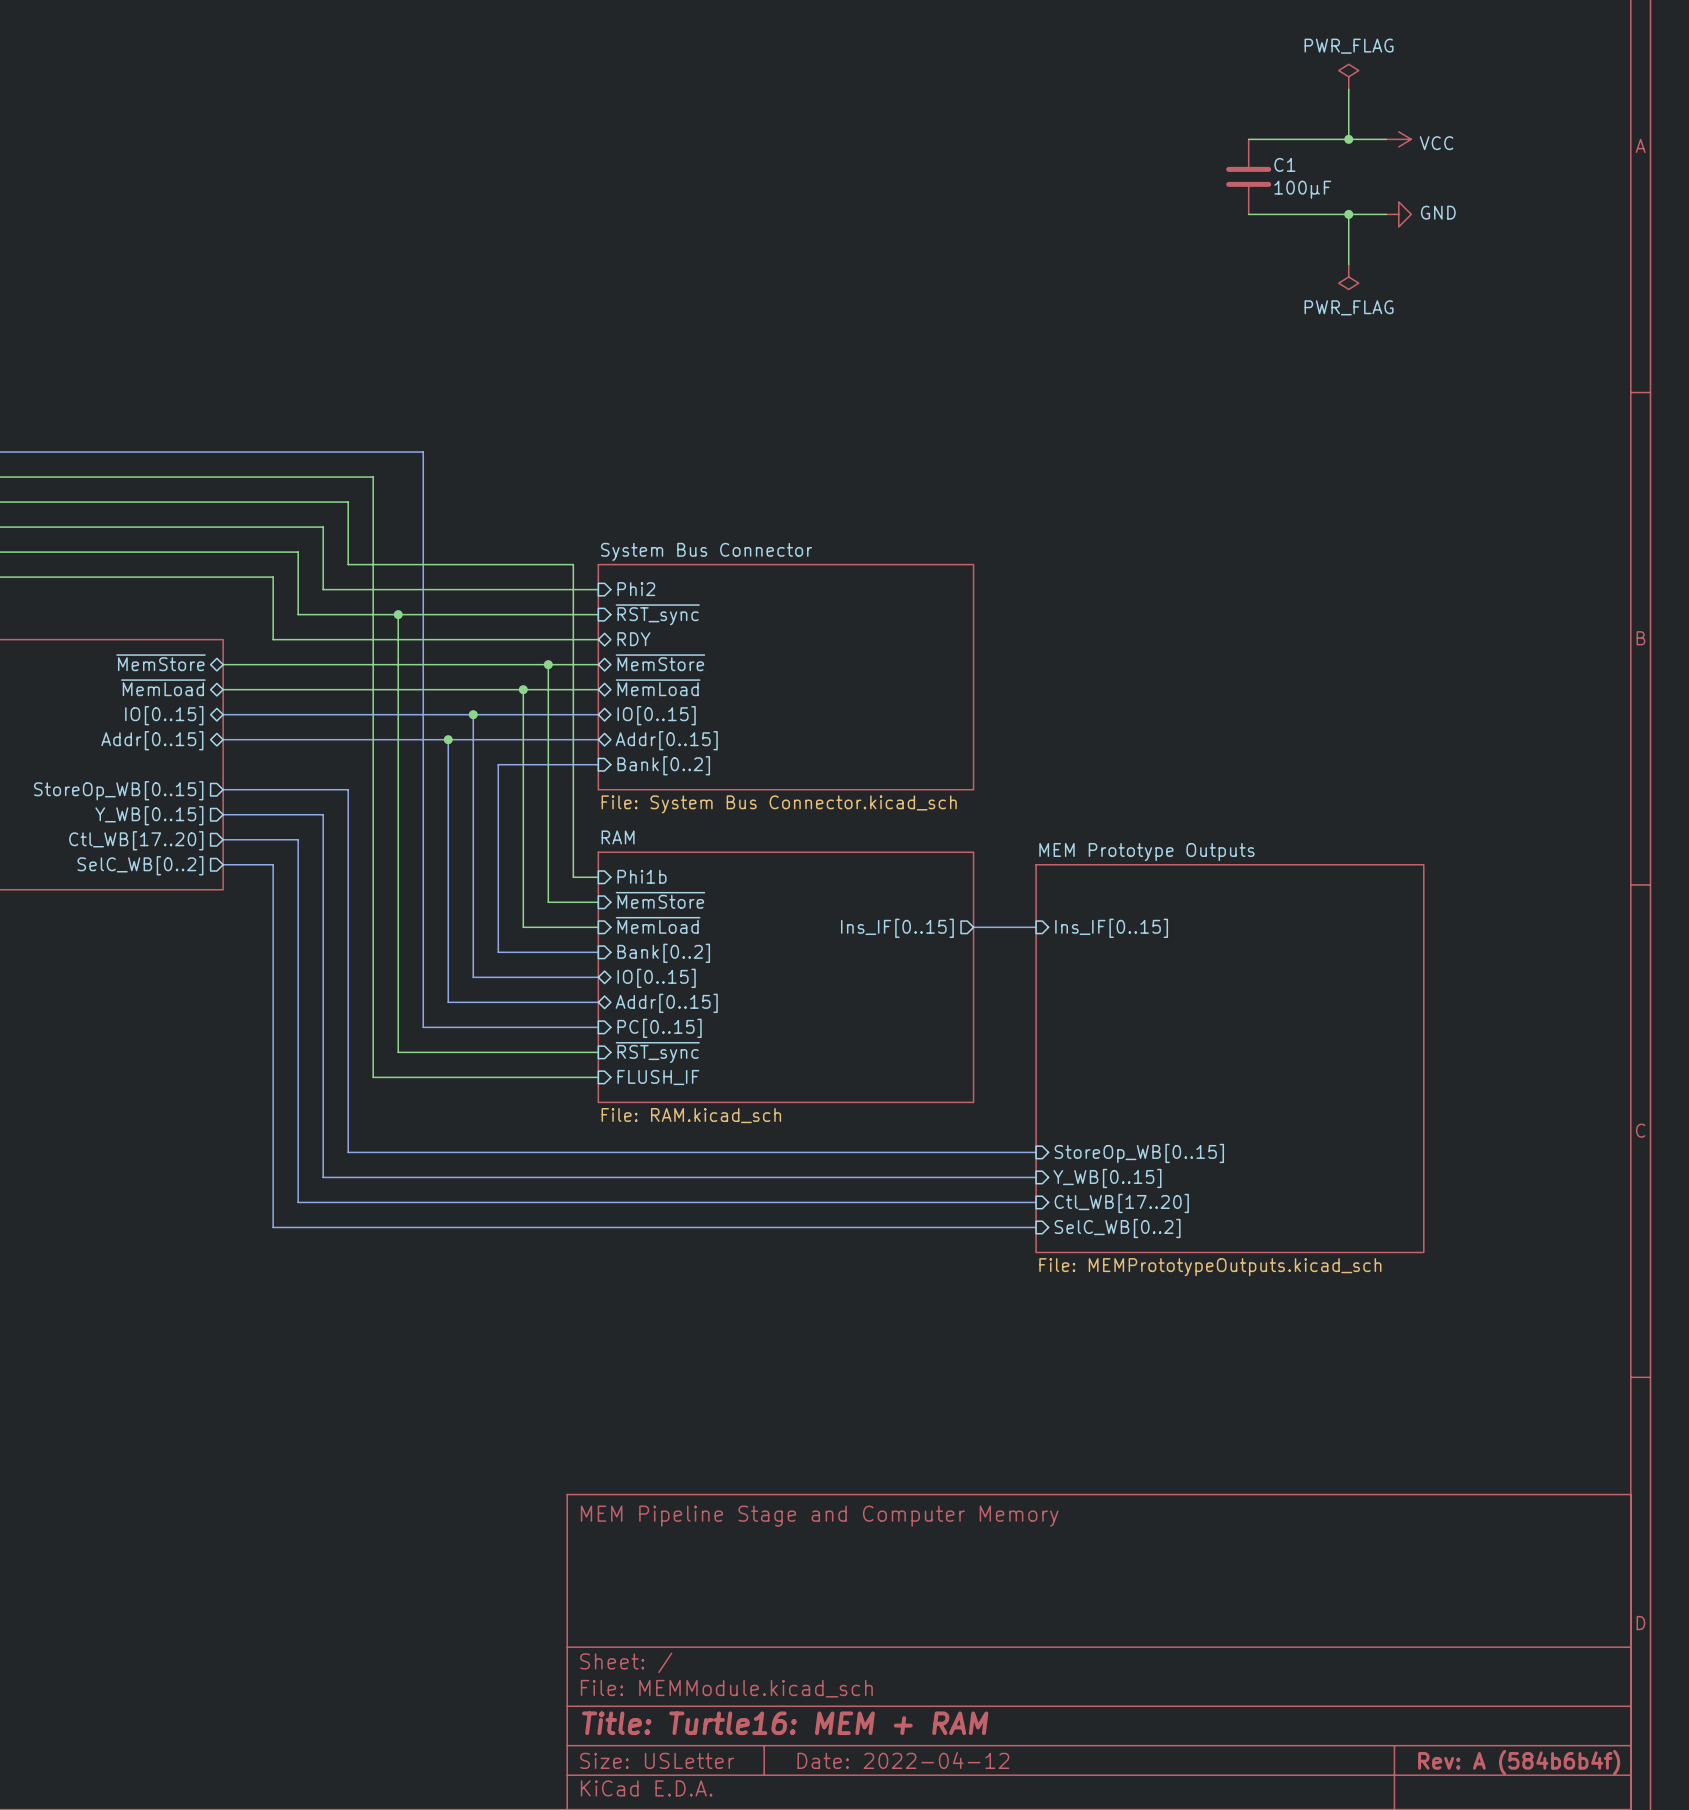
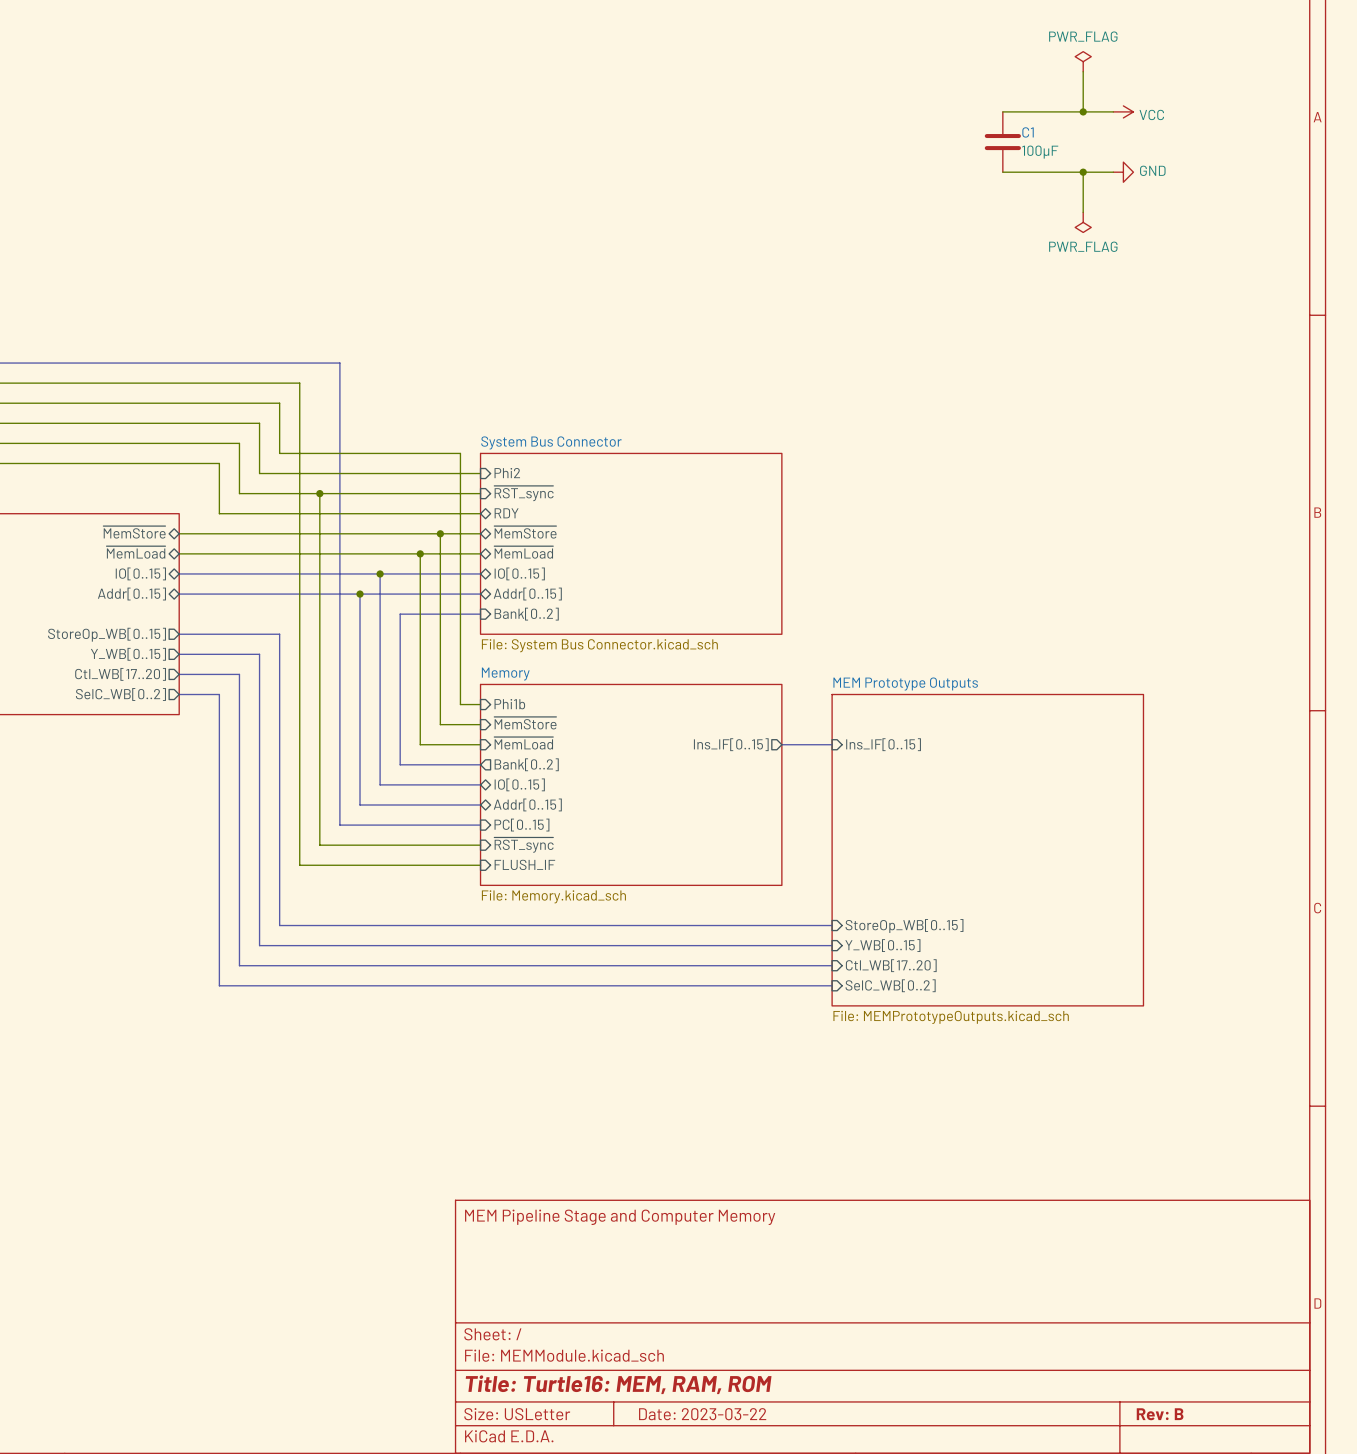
sheet RAM name: RAM (618, 837) -> Memory (505, 674)
sheet pin shape: input (663, 953) -> output (526, 764)
sheet RAM value: File: RAM.kicad_sch (691, 1115) -> File: Memory.kicad_sch (553, 896)
title block: Title: Turtle16: MEM + RAM (785, 1723) -> Title: Turtle16: MEM, RAM, ROM (618, 1384)
title block: Date: 2022-04-12 (903, 1760) -> Date: 2023-03-22 (702, 1414)
title block: Rev: A (584b6b4f) (1519, 1762) -> Rev: B (1160, 1414)

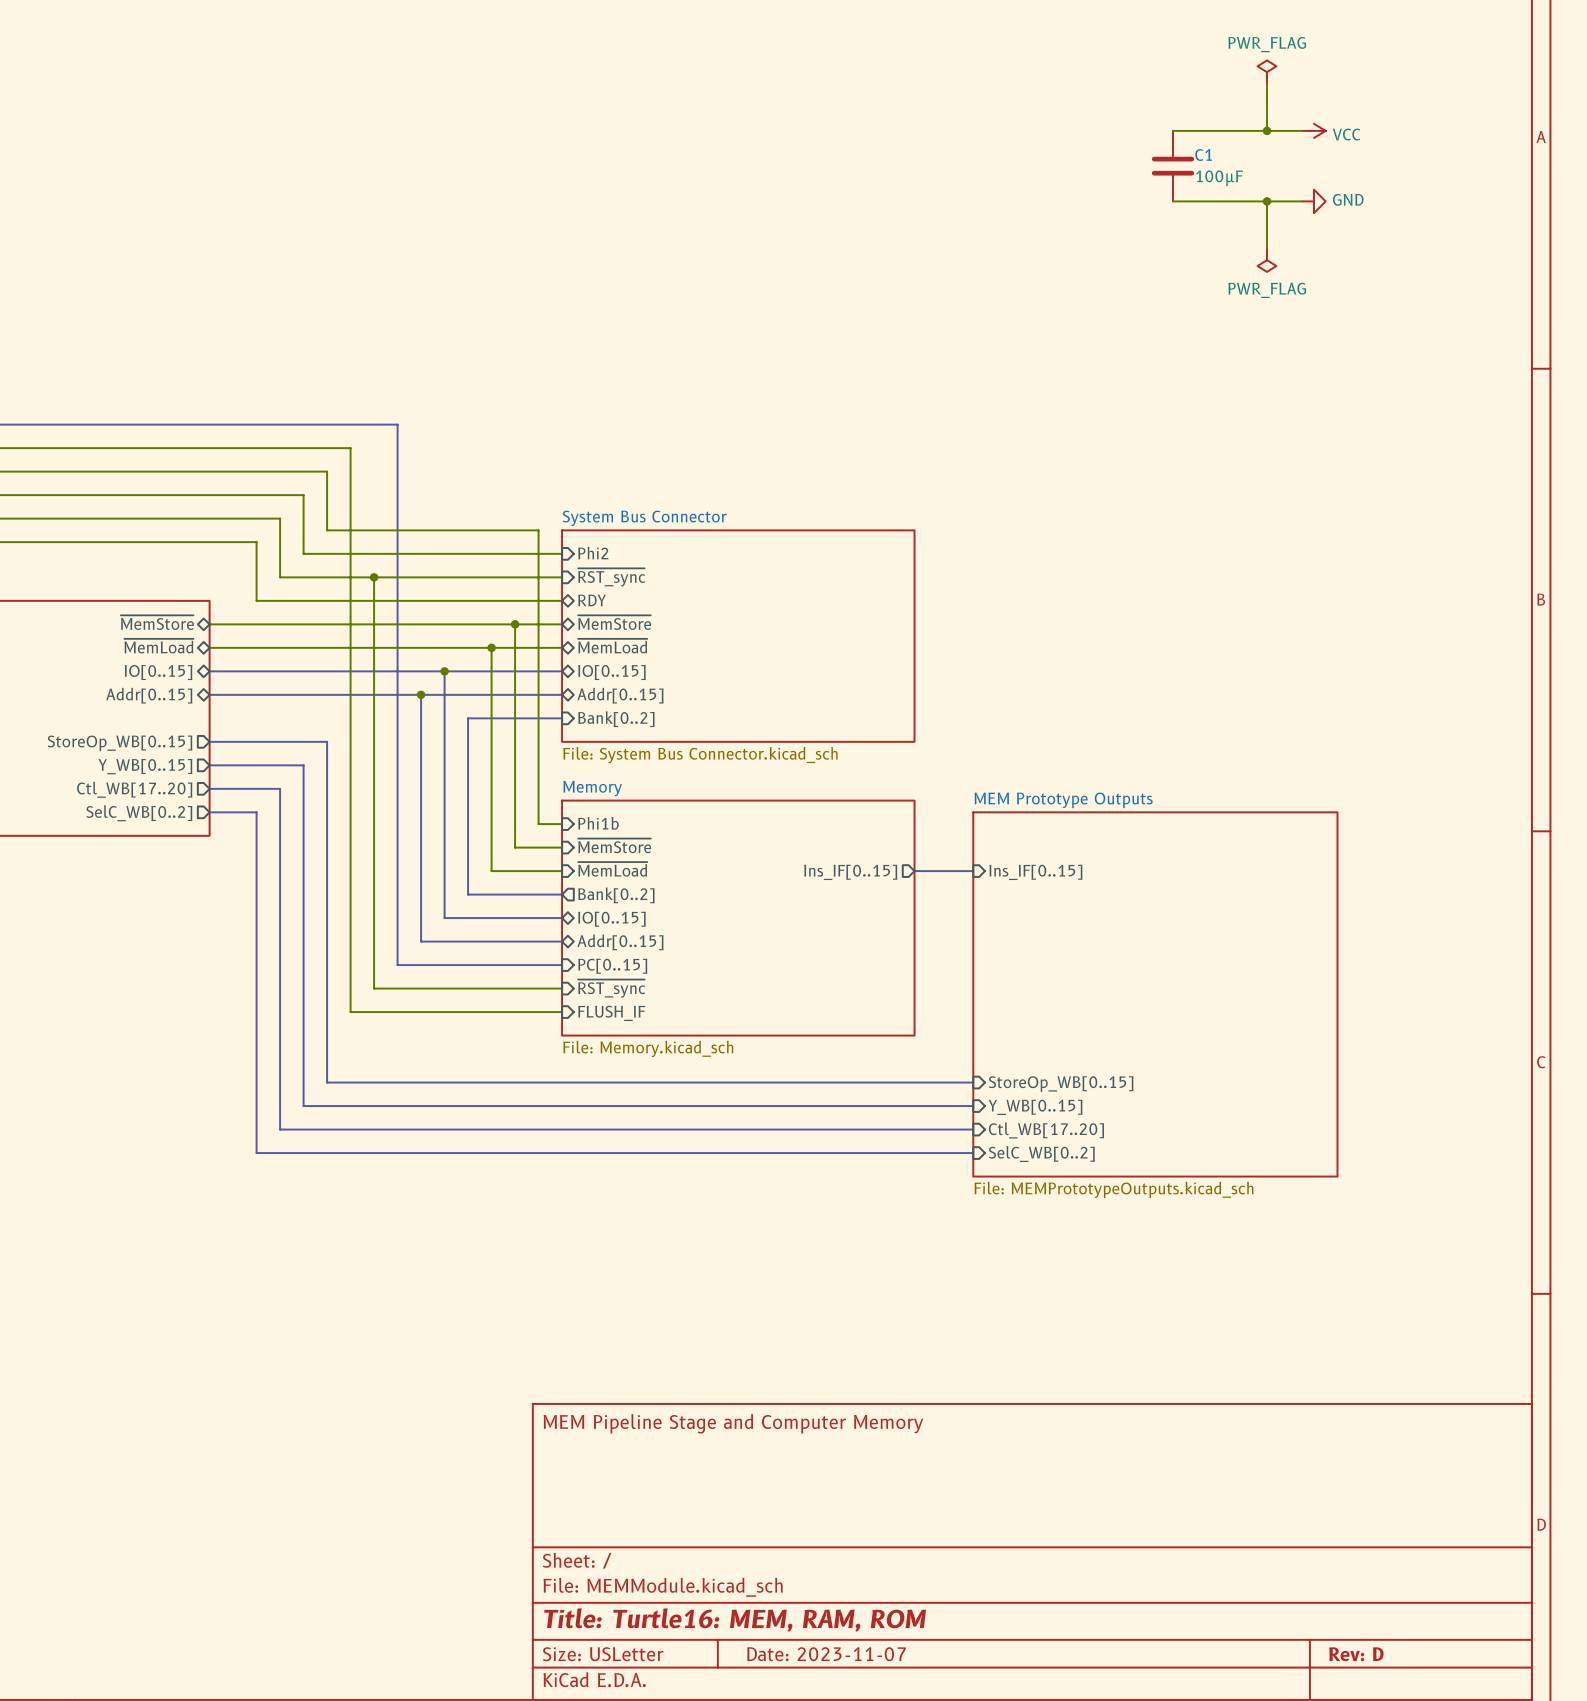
title block: Date: 2023-03-22 (702, 1414) -> Date: 2023-11-07 (826, 1654)
title block: Rev: B (1160, 1414) -> Rev: D (1356, 1654)

